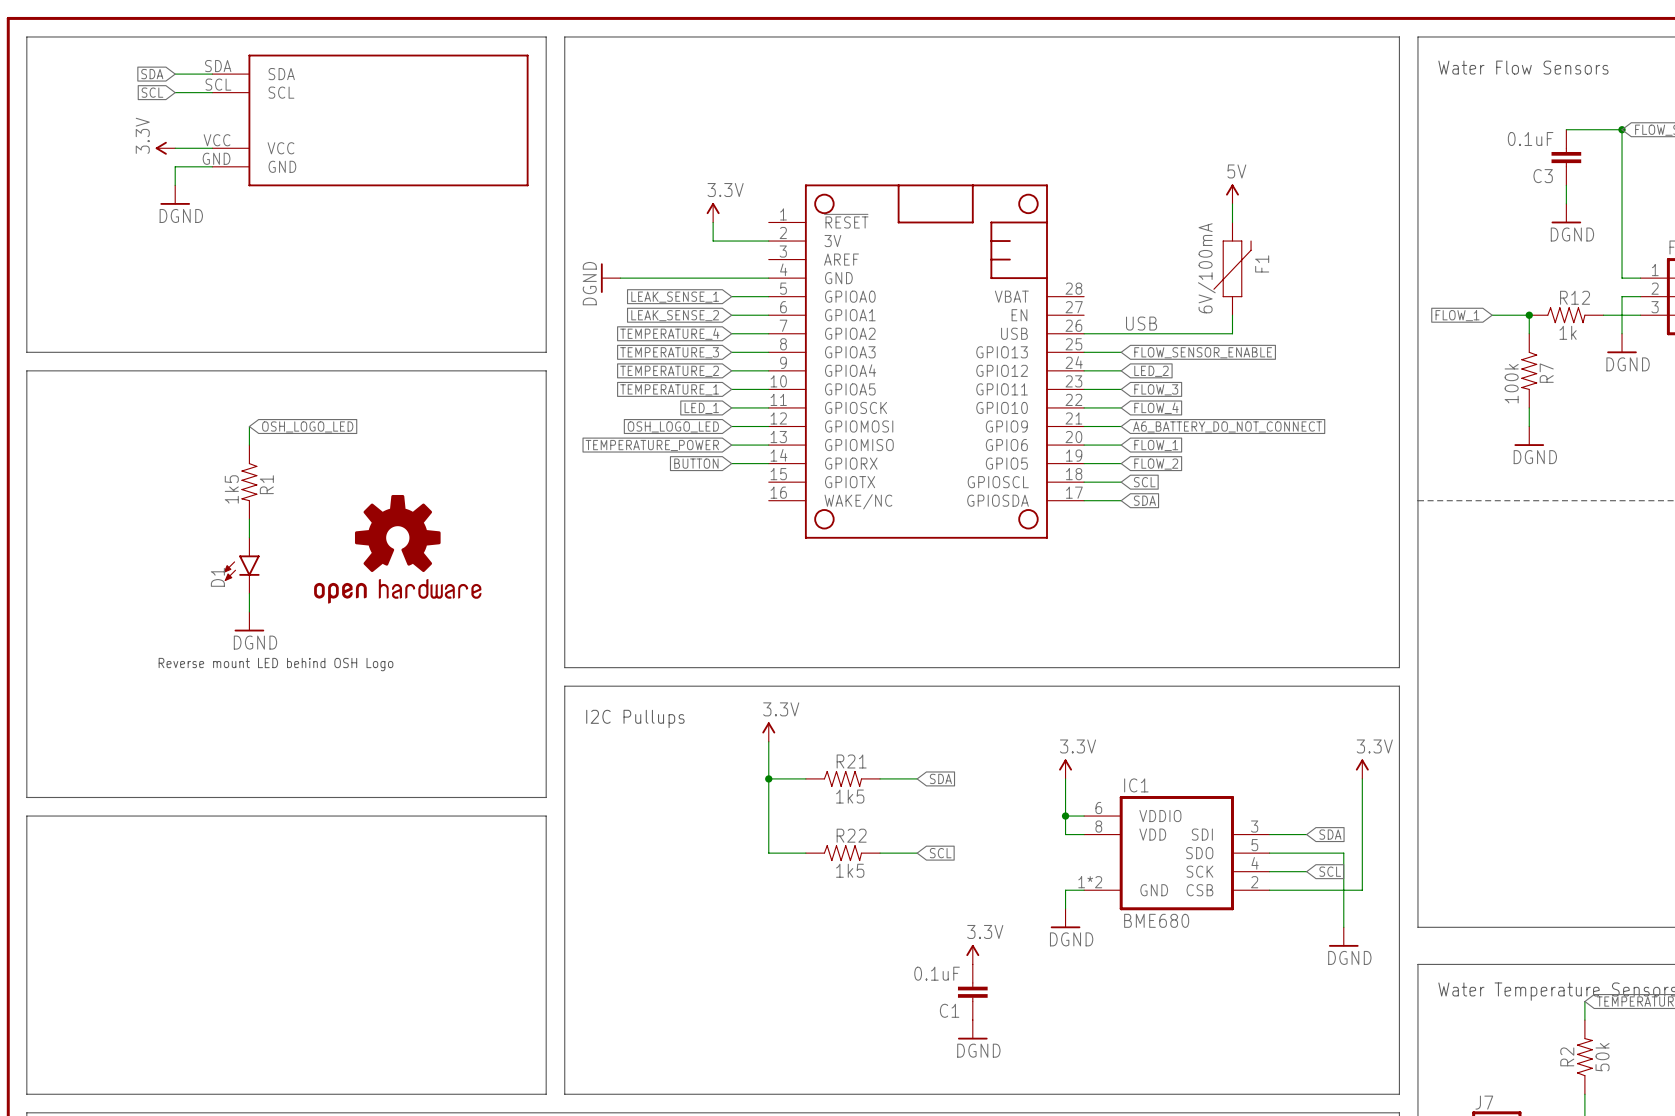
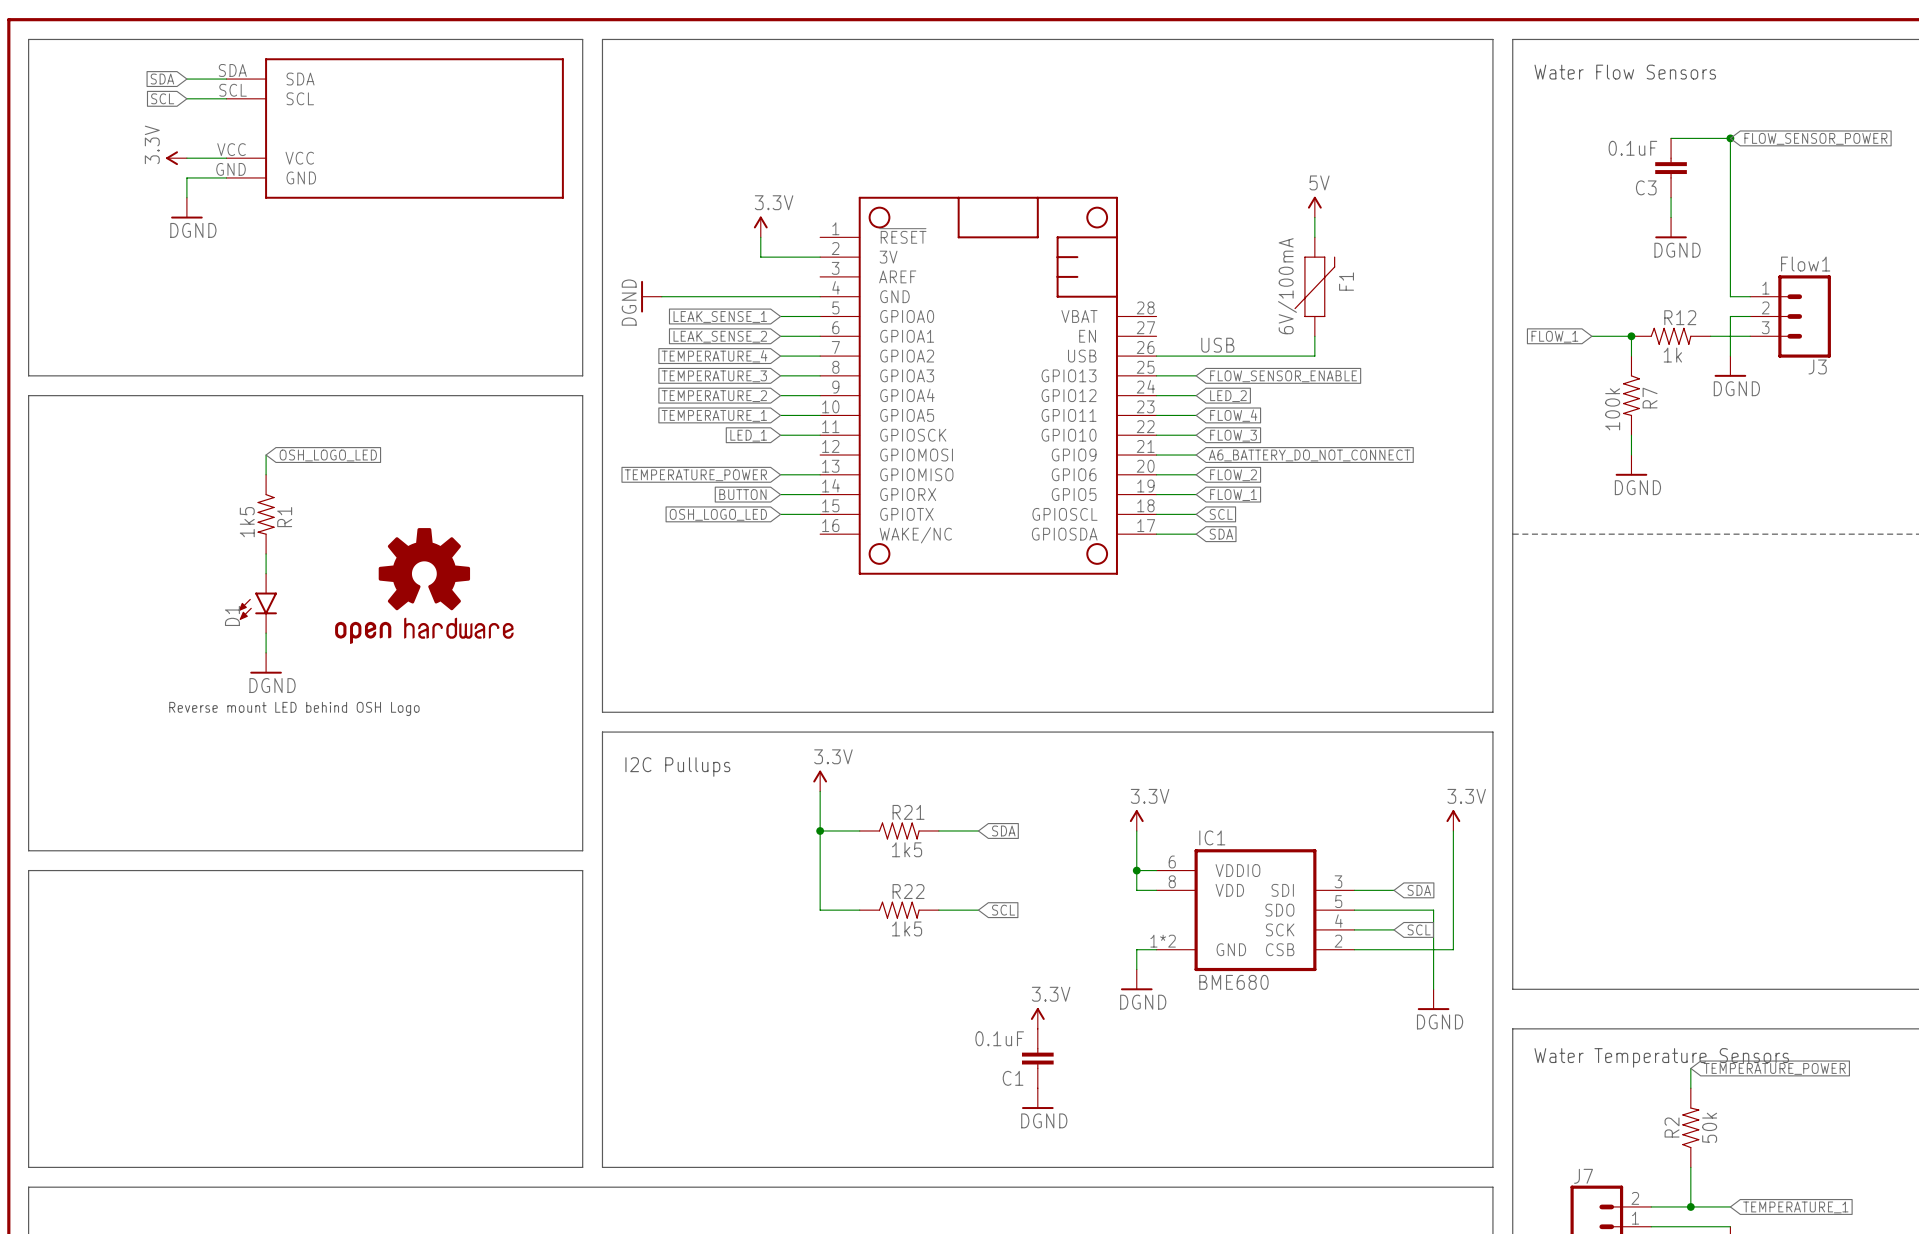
global label: FLOW_3 (1156, 389) -> FLOW_4 (1233, 415)
global label: FLOW_4 (1156, 408) -> FLOW_3 (1233, 435)
global label position: OSH_LOGO_LED (673, 426) -> OSH_LOGO_LED (718, 514)
wire: (731, 426) (768, 426) -> (780, 514) (820, 514)
global label: FLOW_1 (1156, 445) -> FLOW_2 (1233, 475)
global label: FLOW_2 (1156, 464) -> FLOW_1 (1233, 495)

